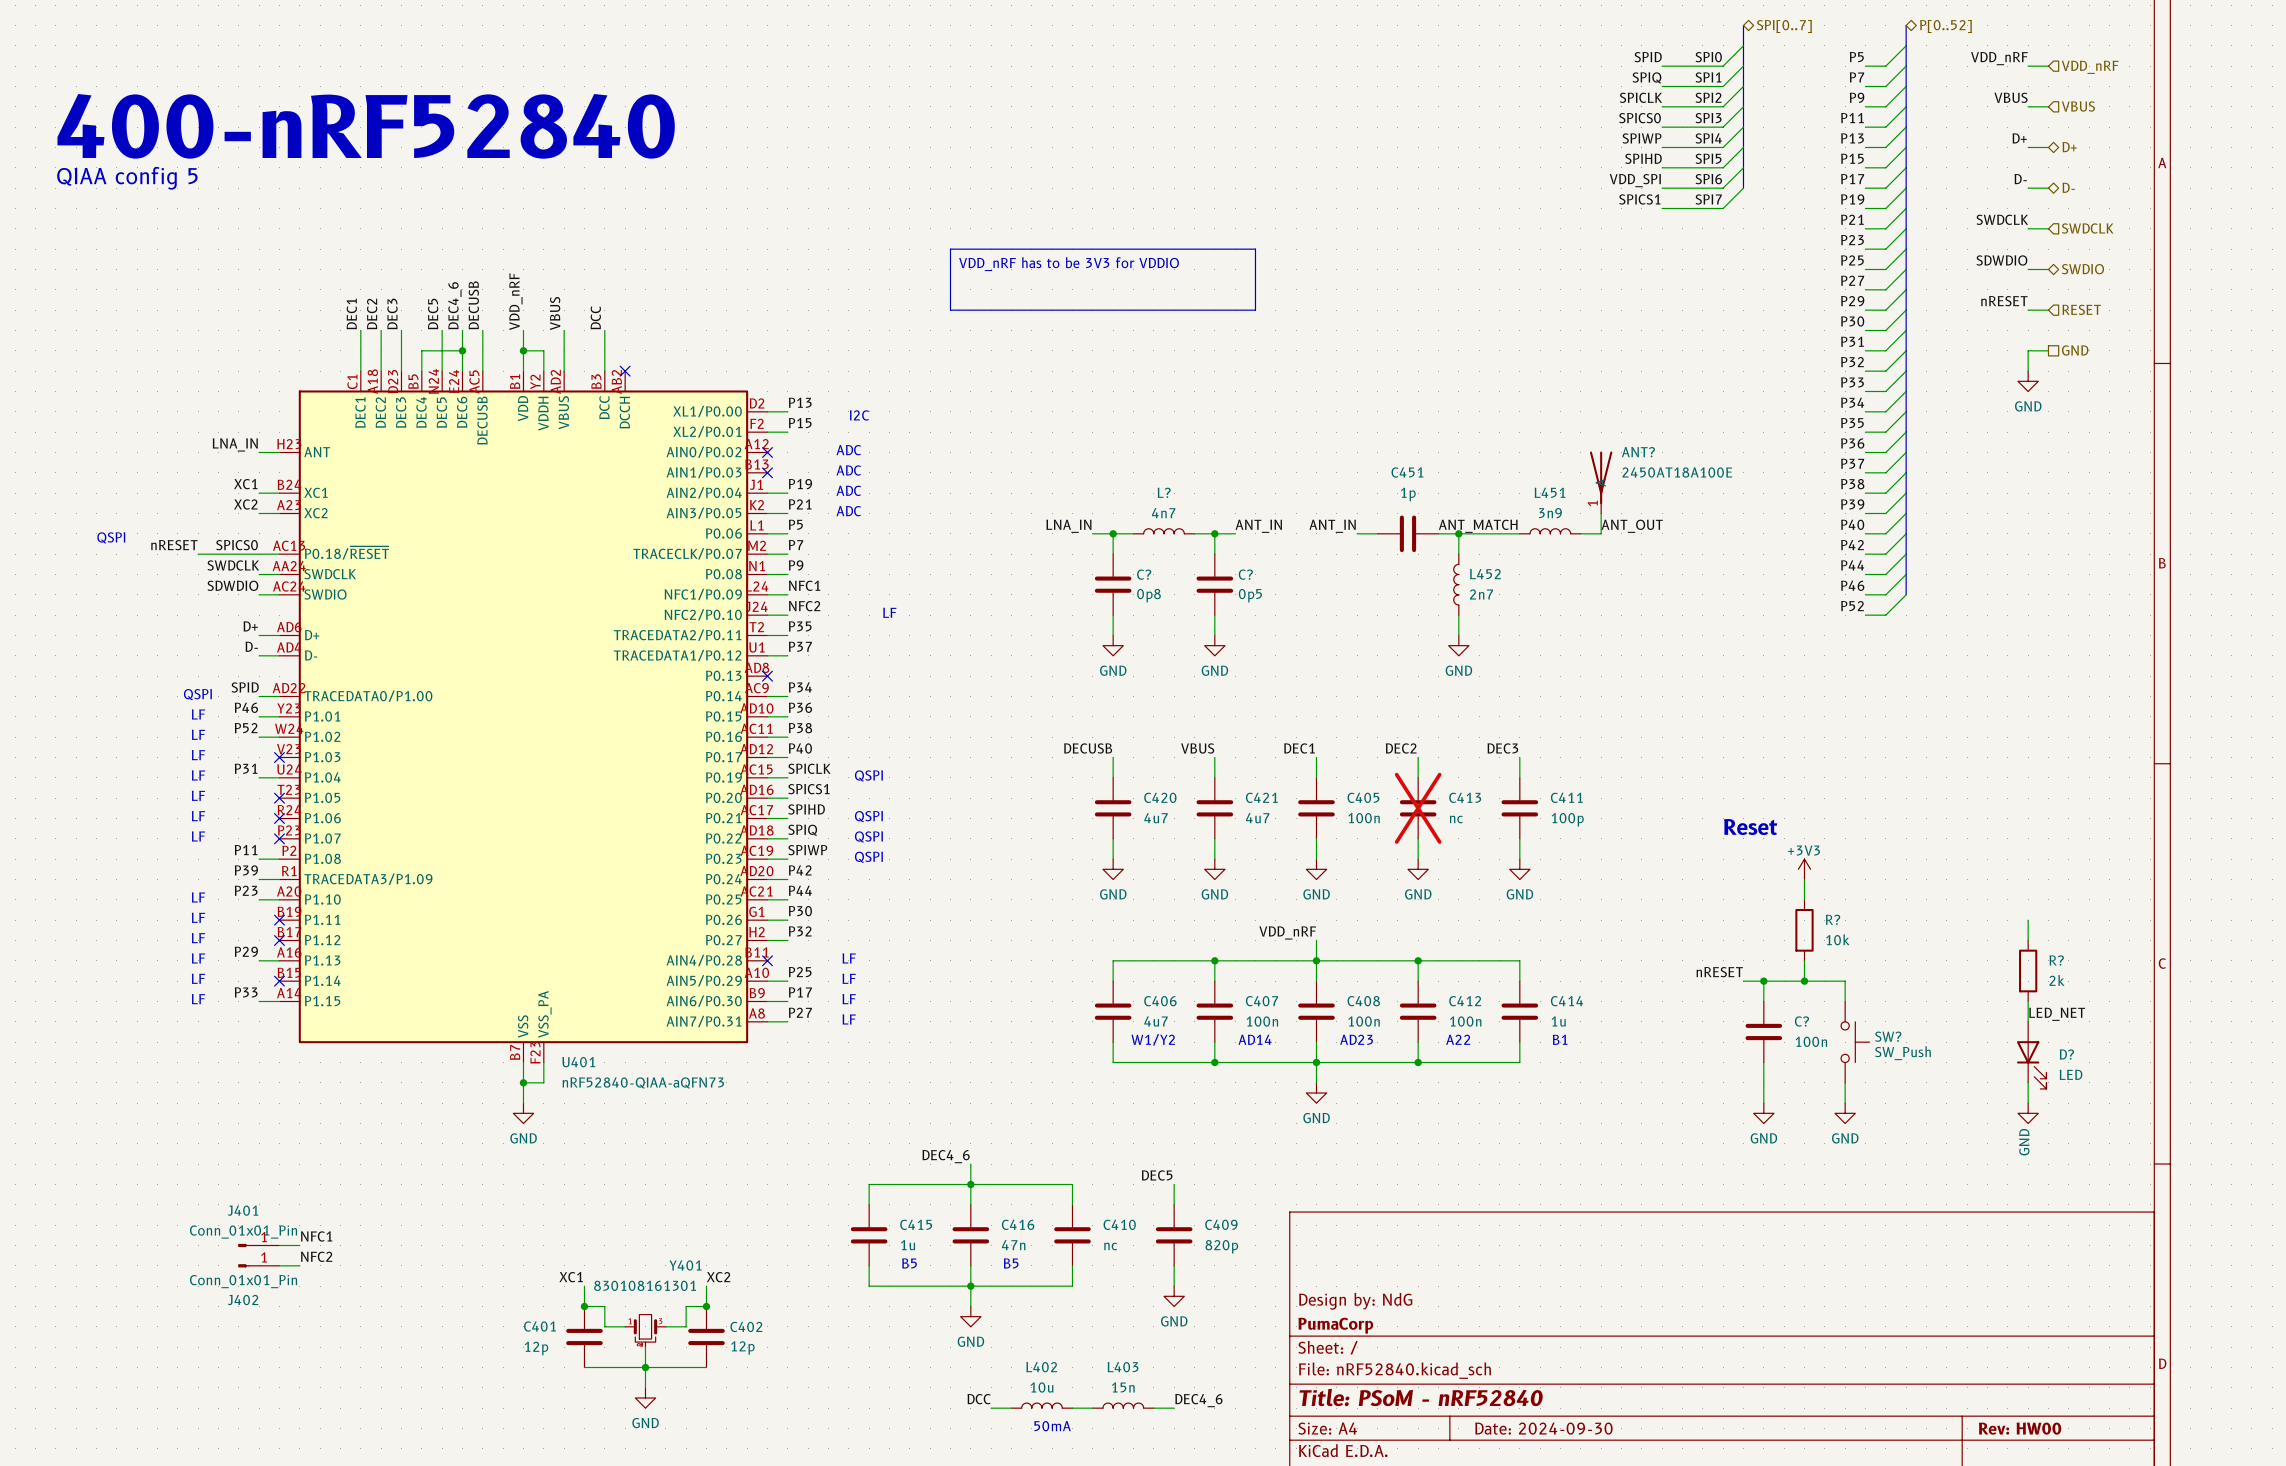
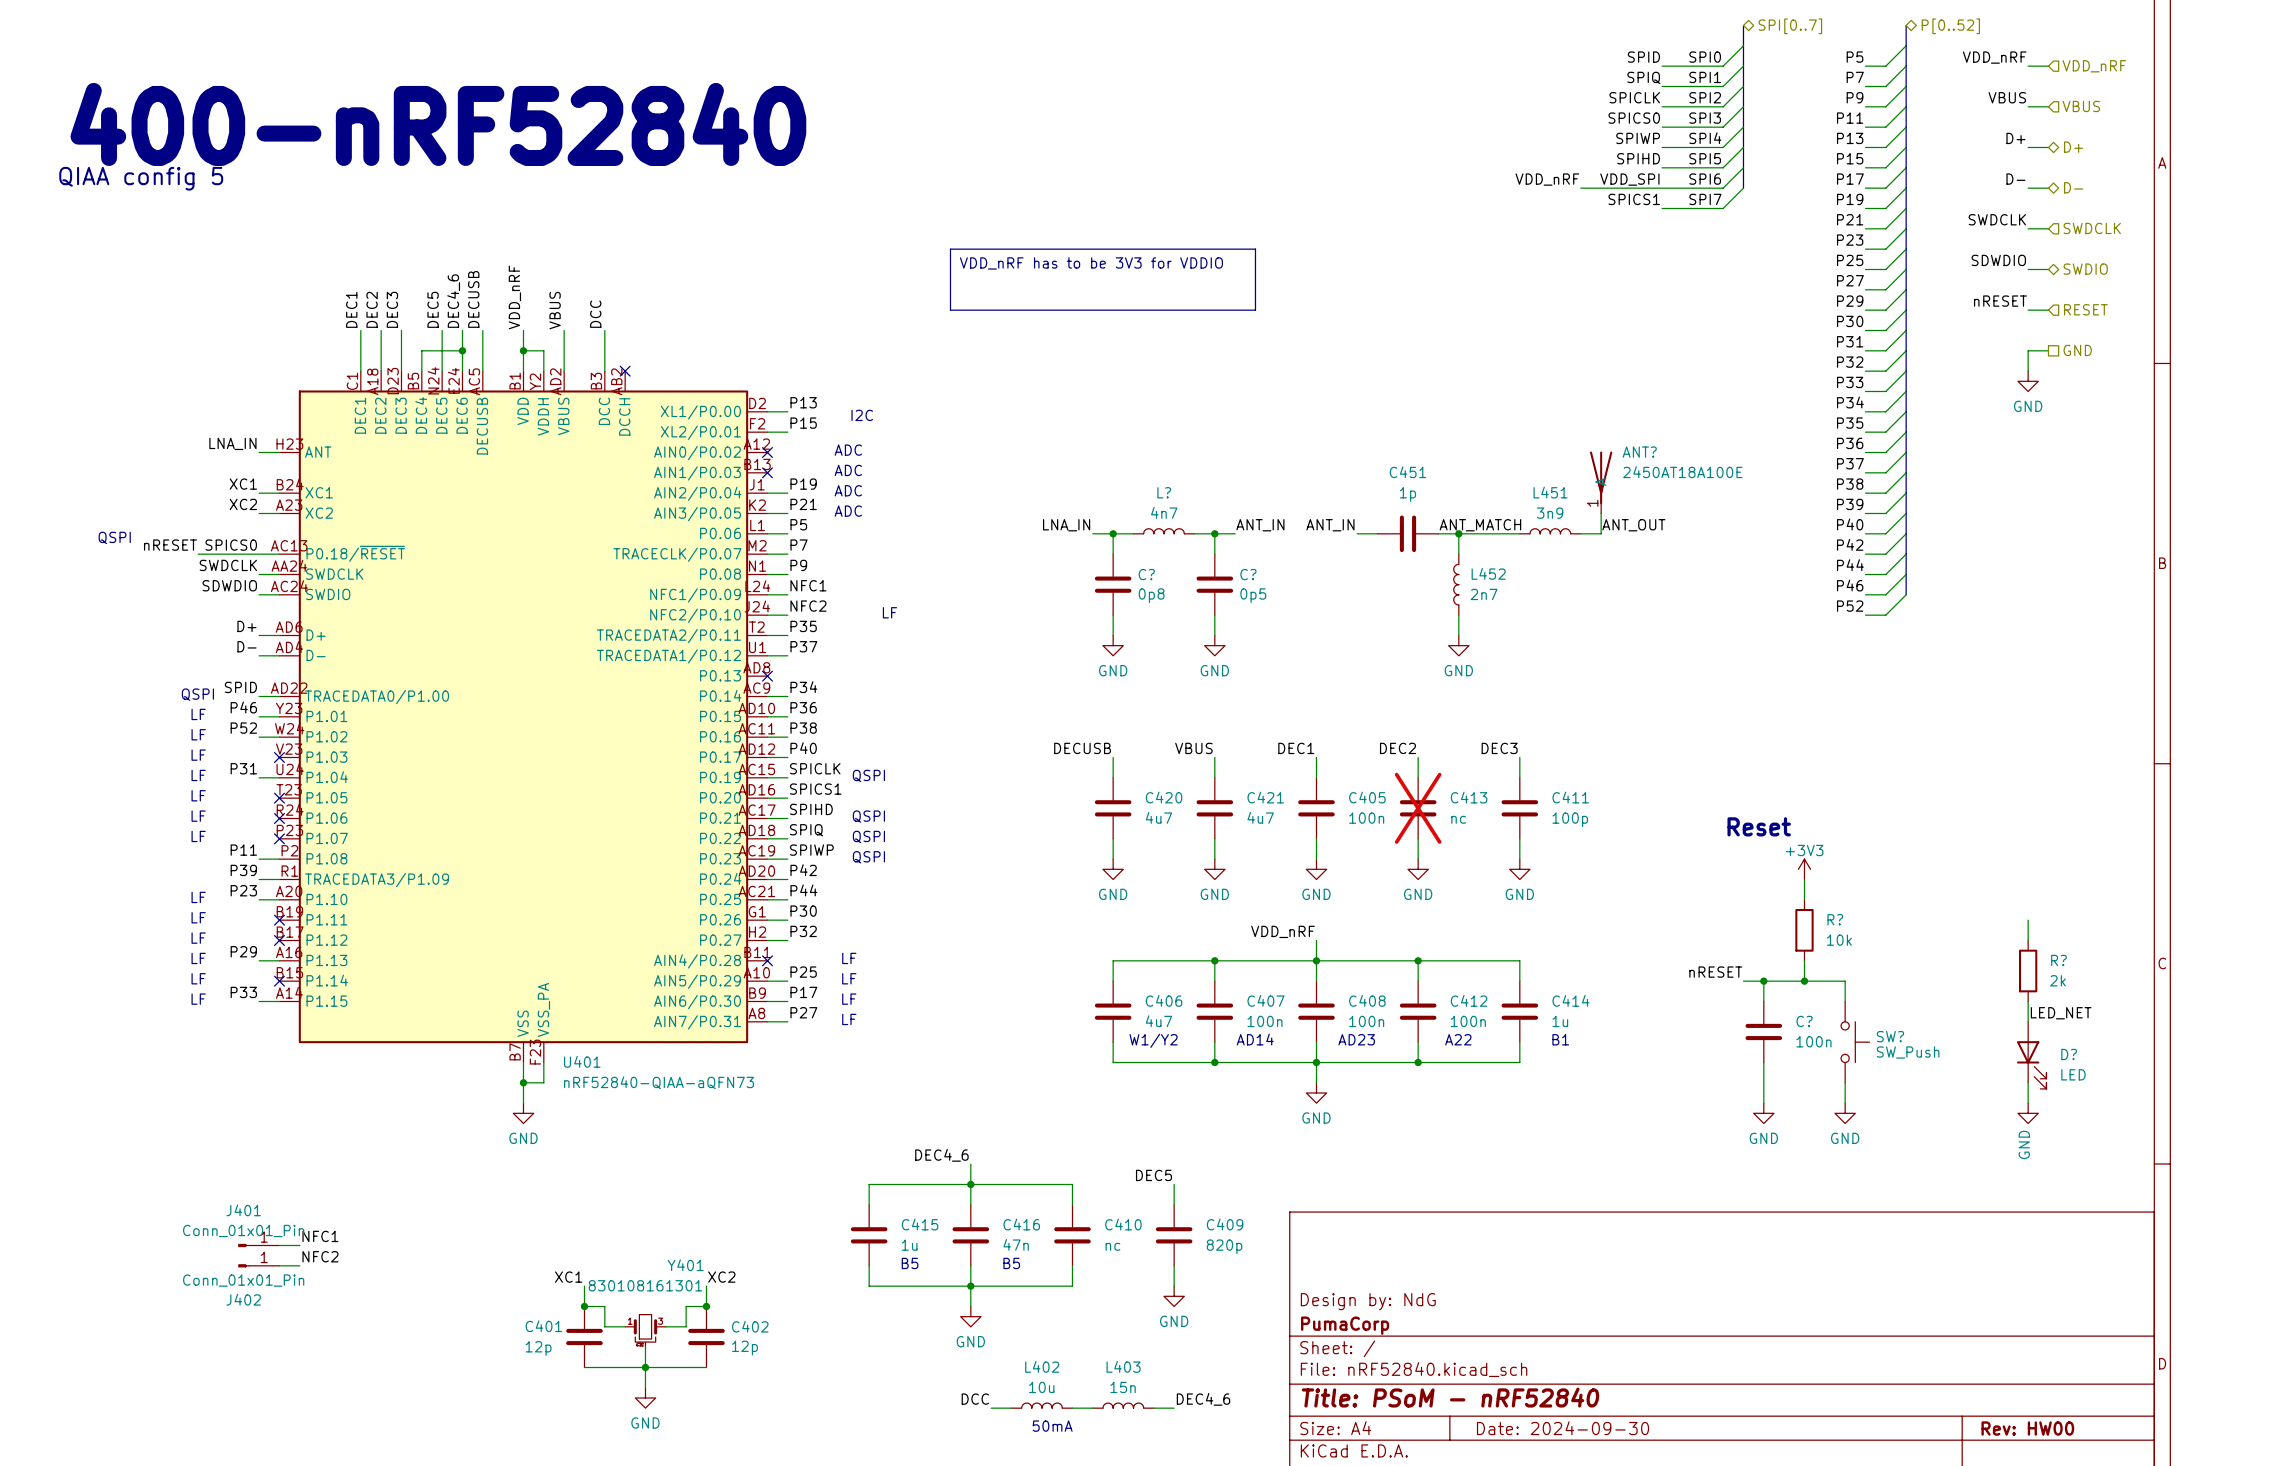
label: none -> VDD_nRF (1547, 179)
wire: none -> (1580, 188) (1662, 188)

